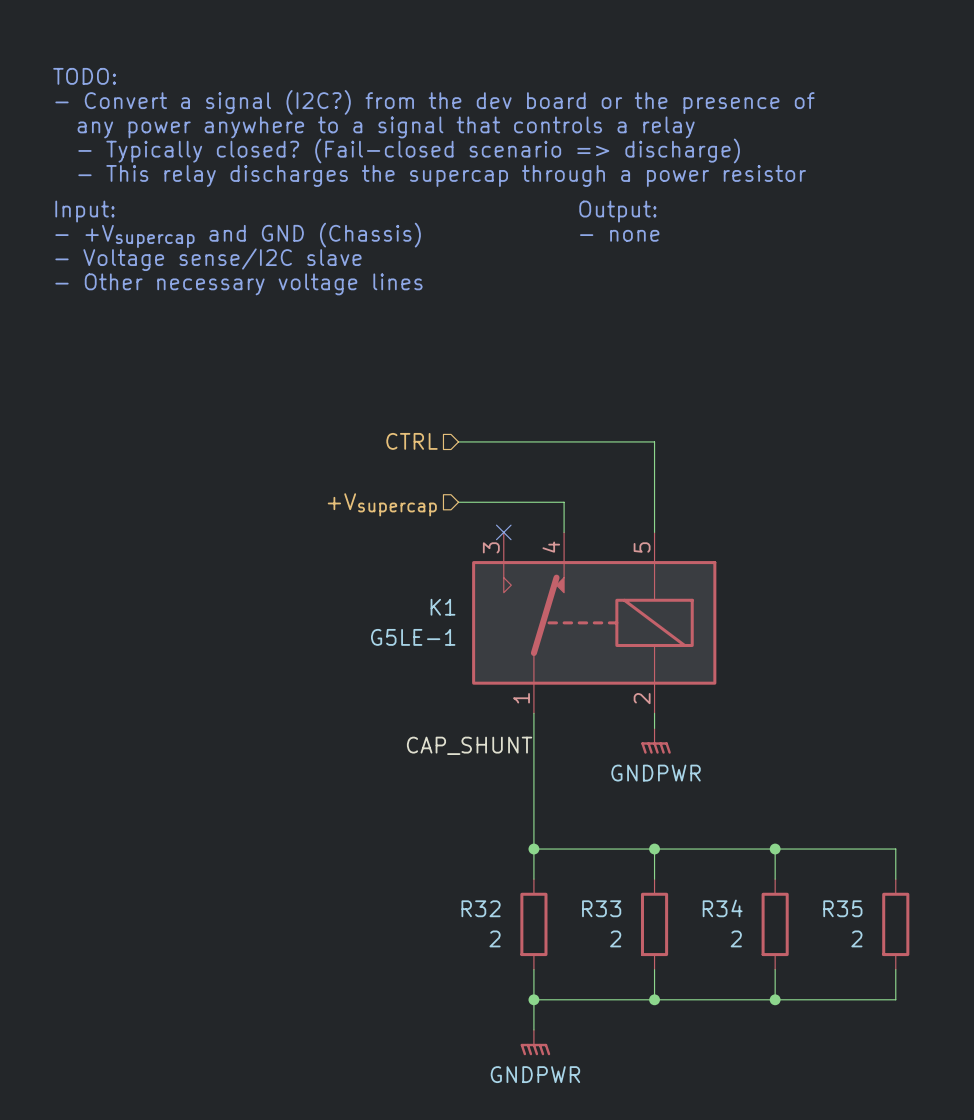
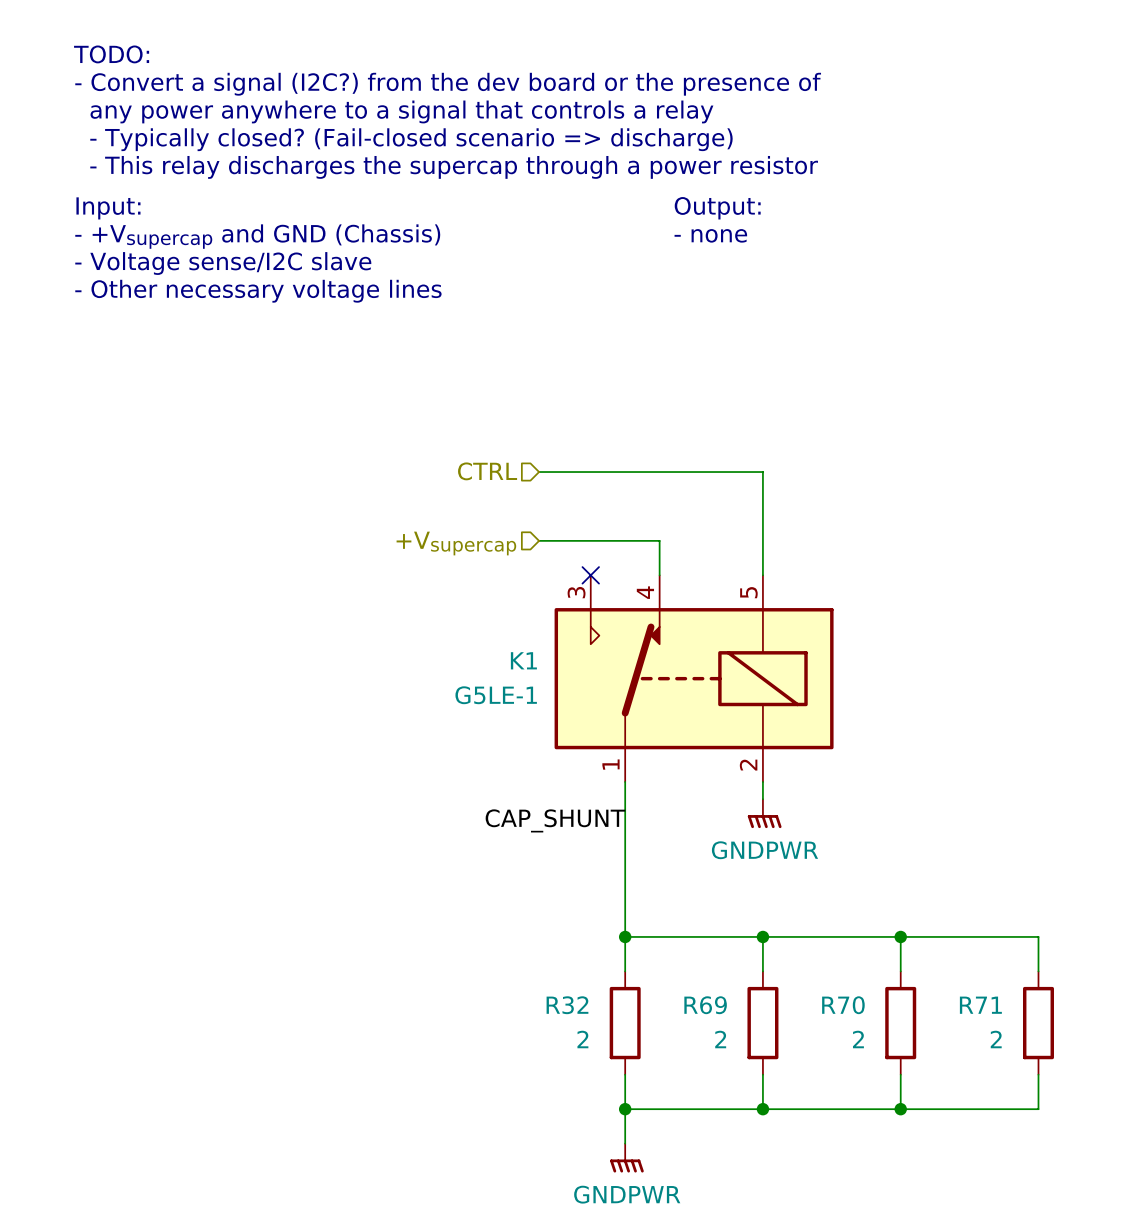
R33 name: R33 (601, 908) -> R69 (705, 1005)
R34 name: R34 (722, 908) -> R70 (843, 1005)
R35 name: R35 (842, 908) -> R71 (980, 1005)

